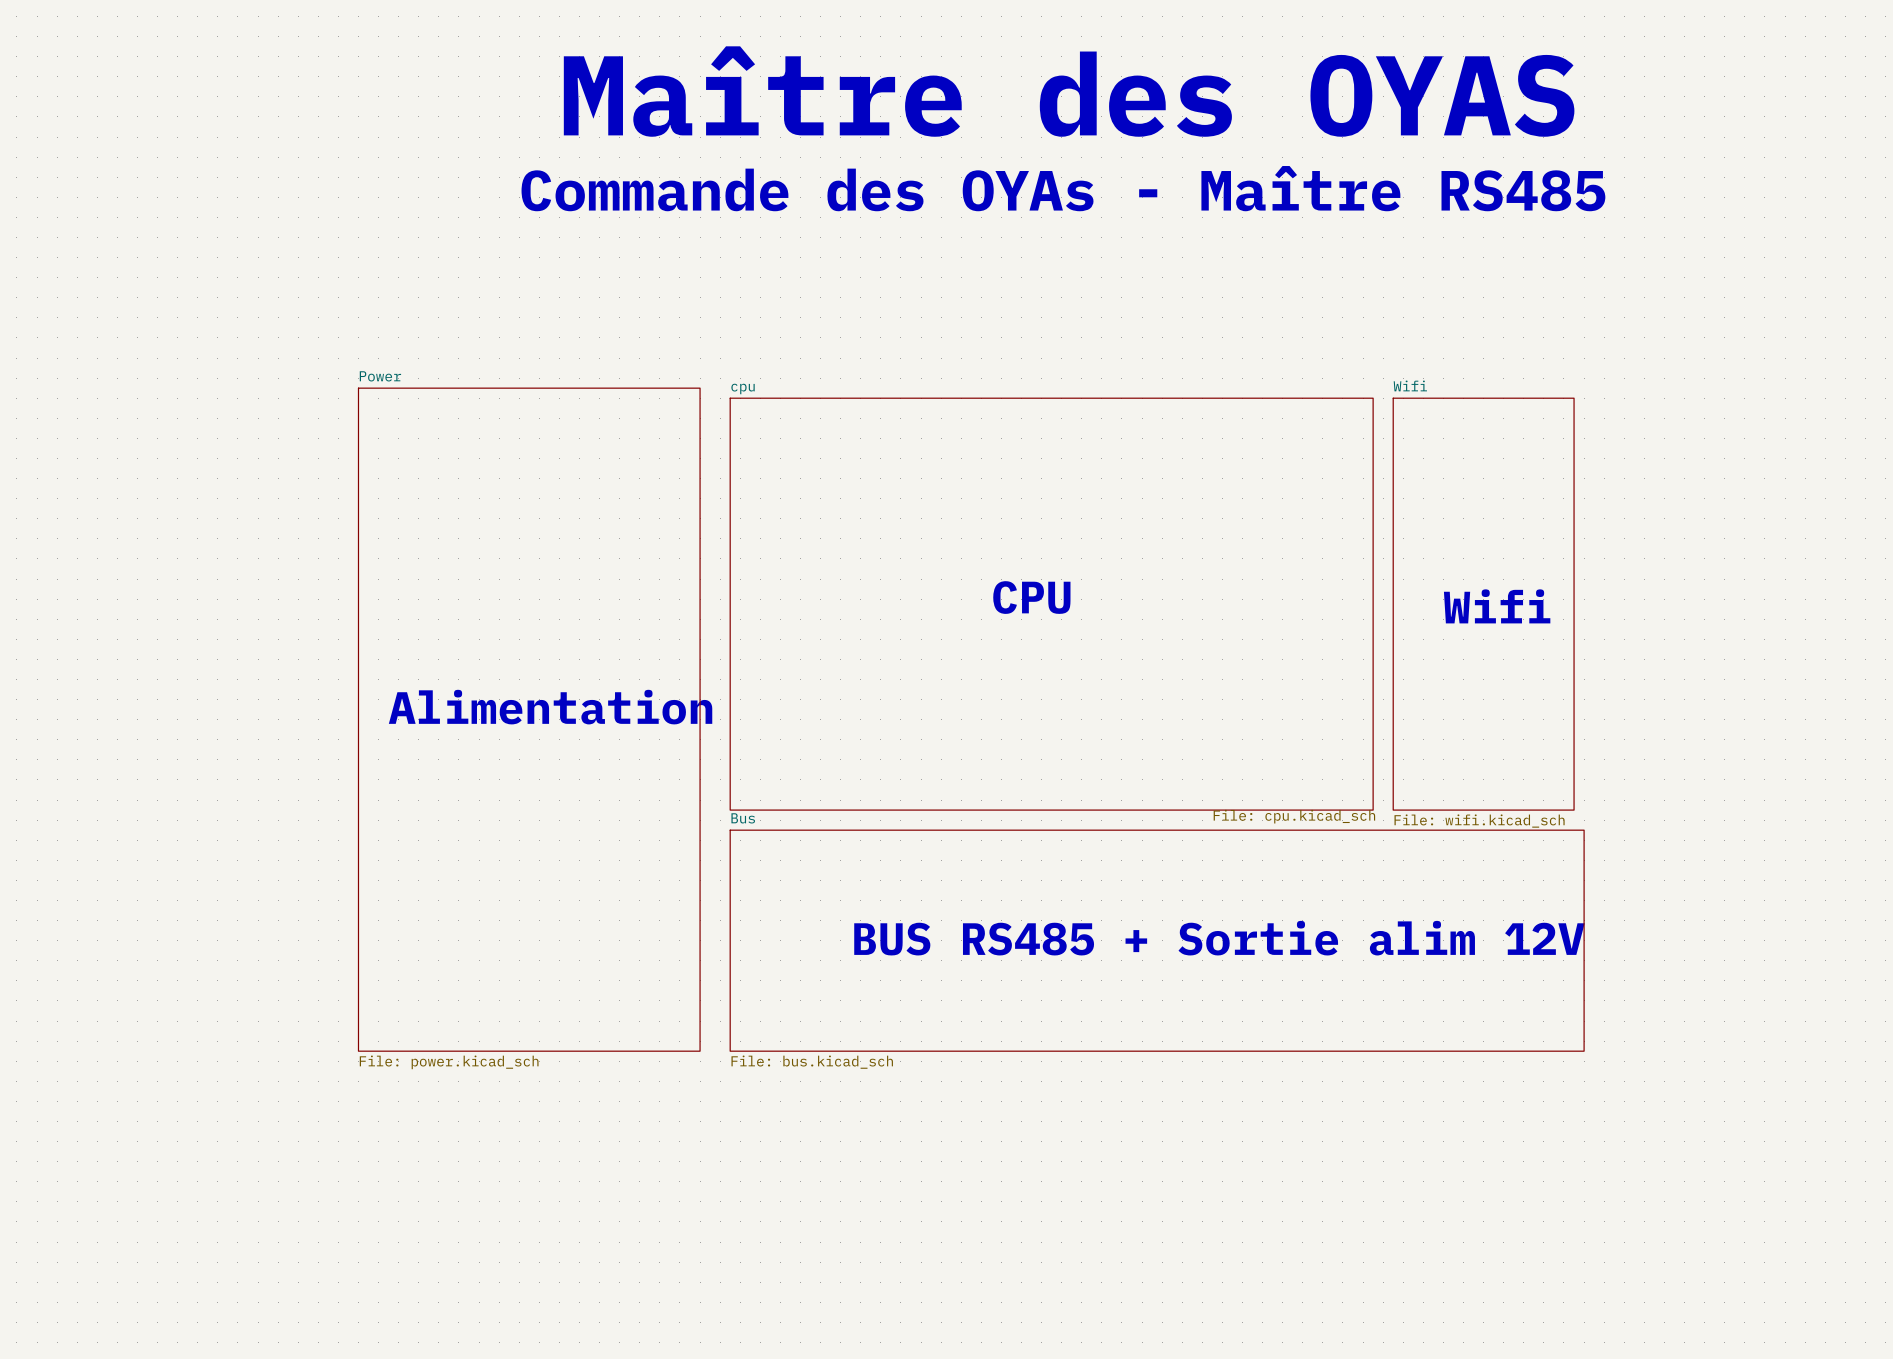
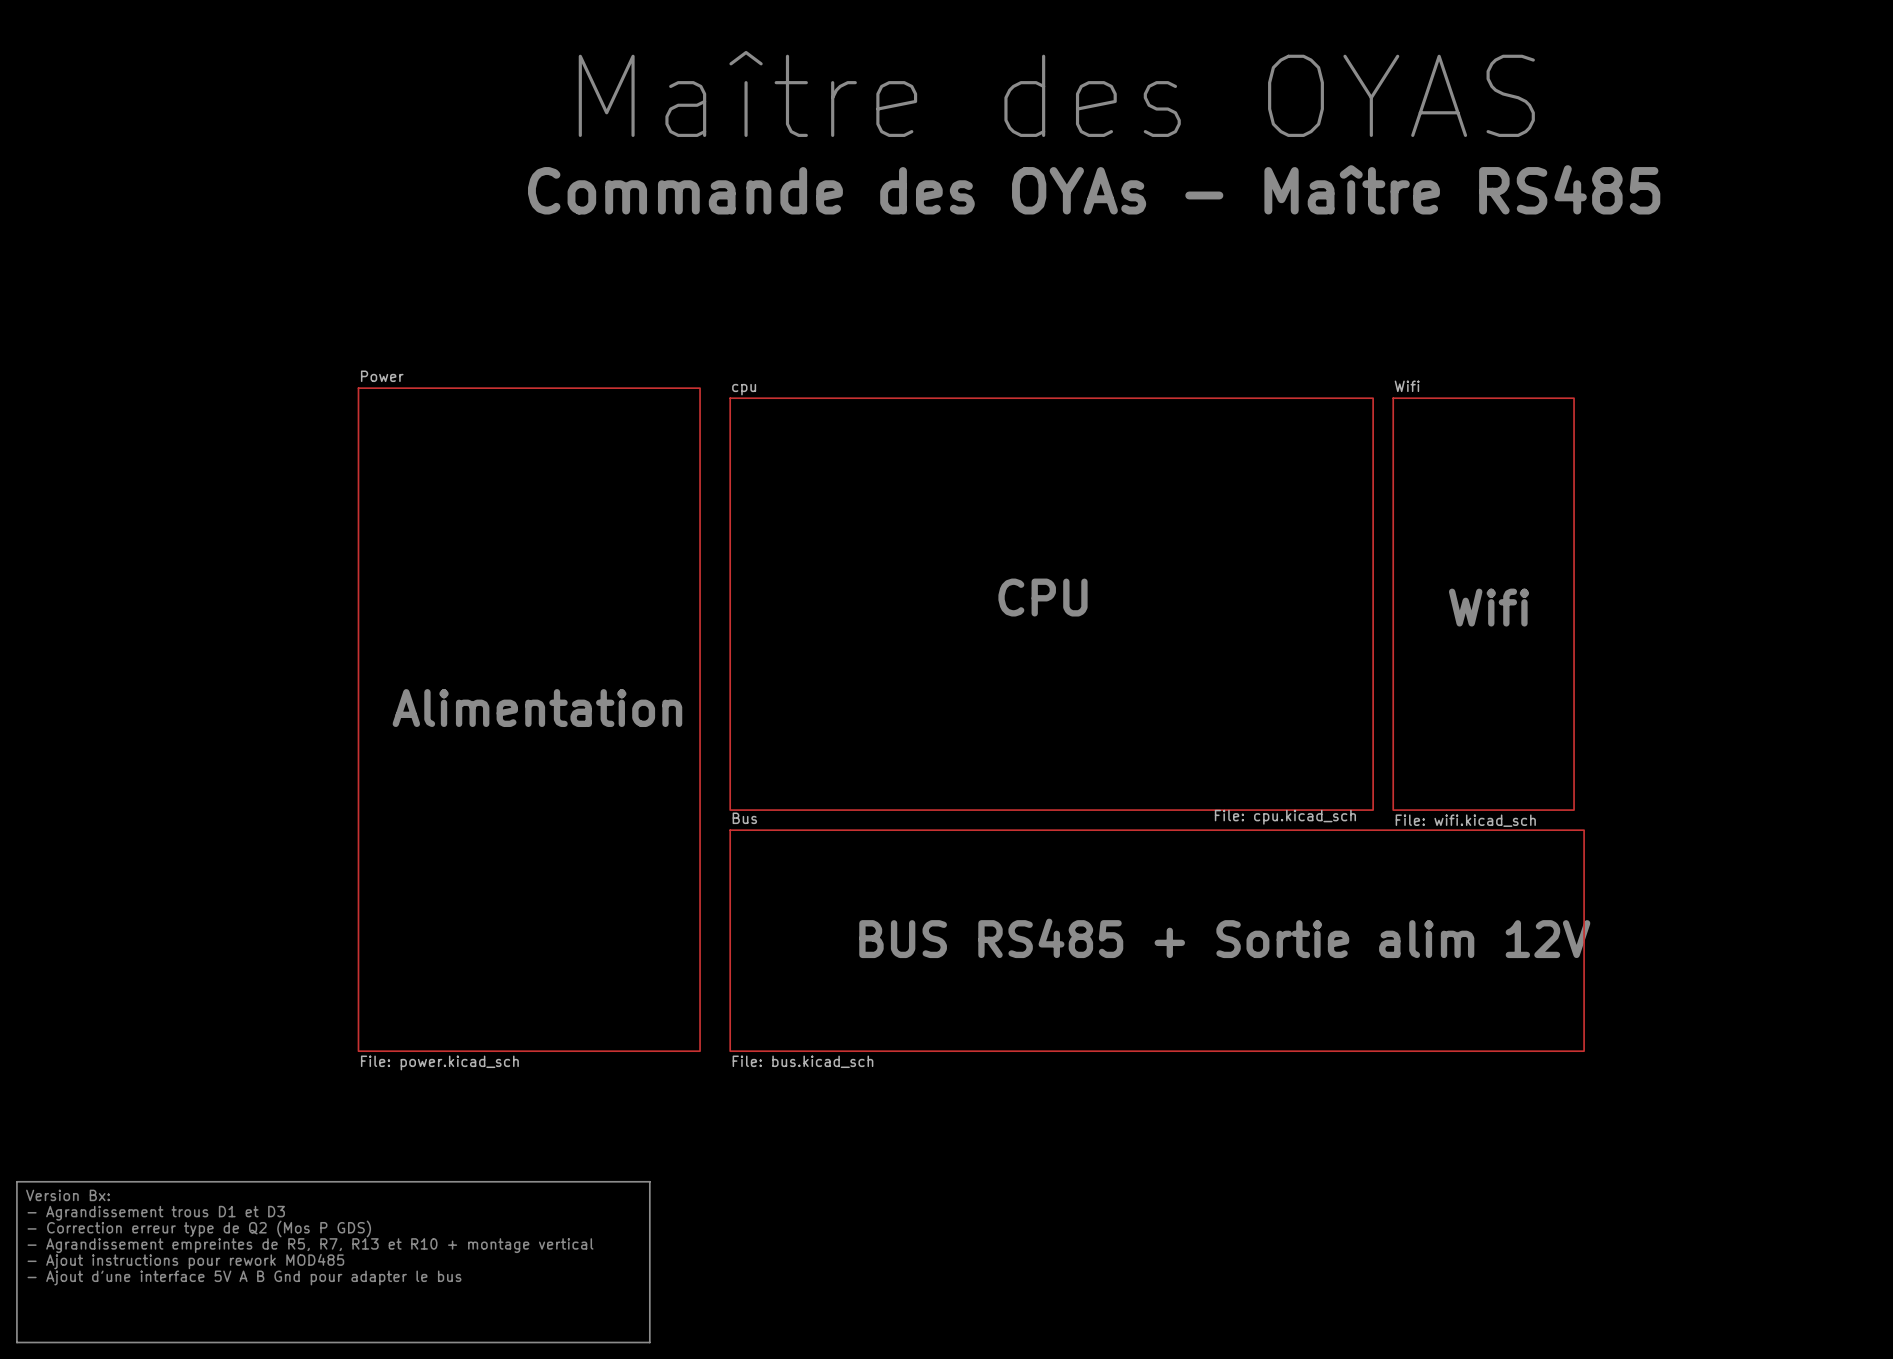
line: none -> (16, 1181) (649, 1181) (649, 1342) (16, 1342) (16, 1181)
text: none -> Version Bx: (67, 1195)
text: none -> - Agrandissement trous D1 et D3 (156, 1213)
text: none -> - Correction erreur type de Q2 (Mos P GDS) (199, 1228)
text: none -> - Agrandissement empreintes de R5, R7, R13 et R10 + montage vertical (310, 1245)
text: none -> - Ajout instructions pour rework MOD485 (185, 1261)
text: none -> - Ajout d'une interface 5V A B Gnd pour adapter le bus (244, 1277)

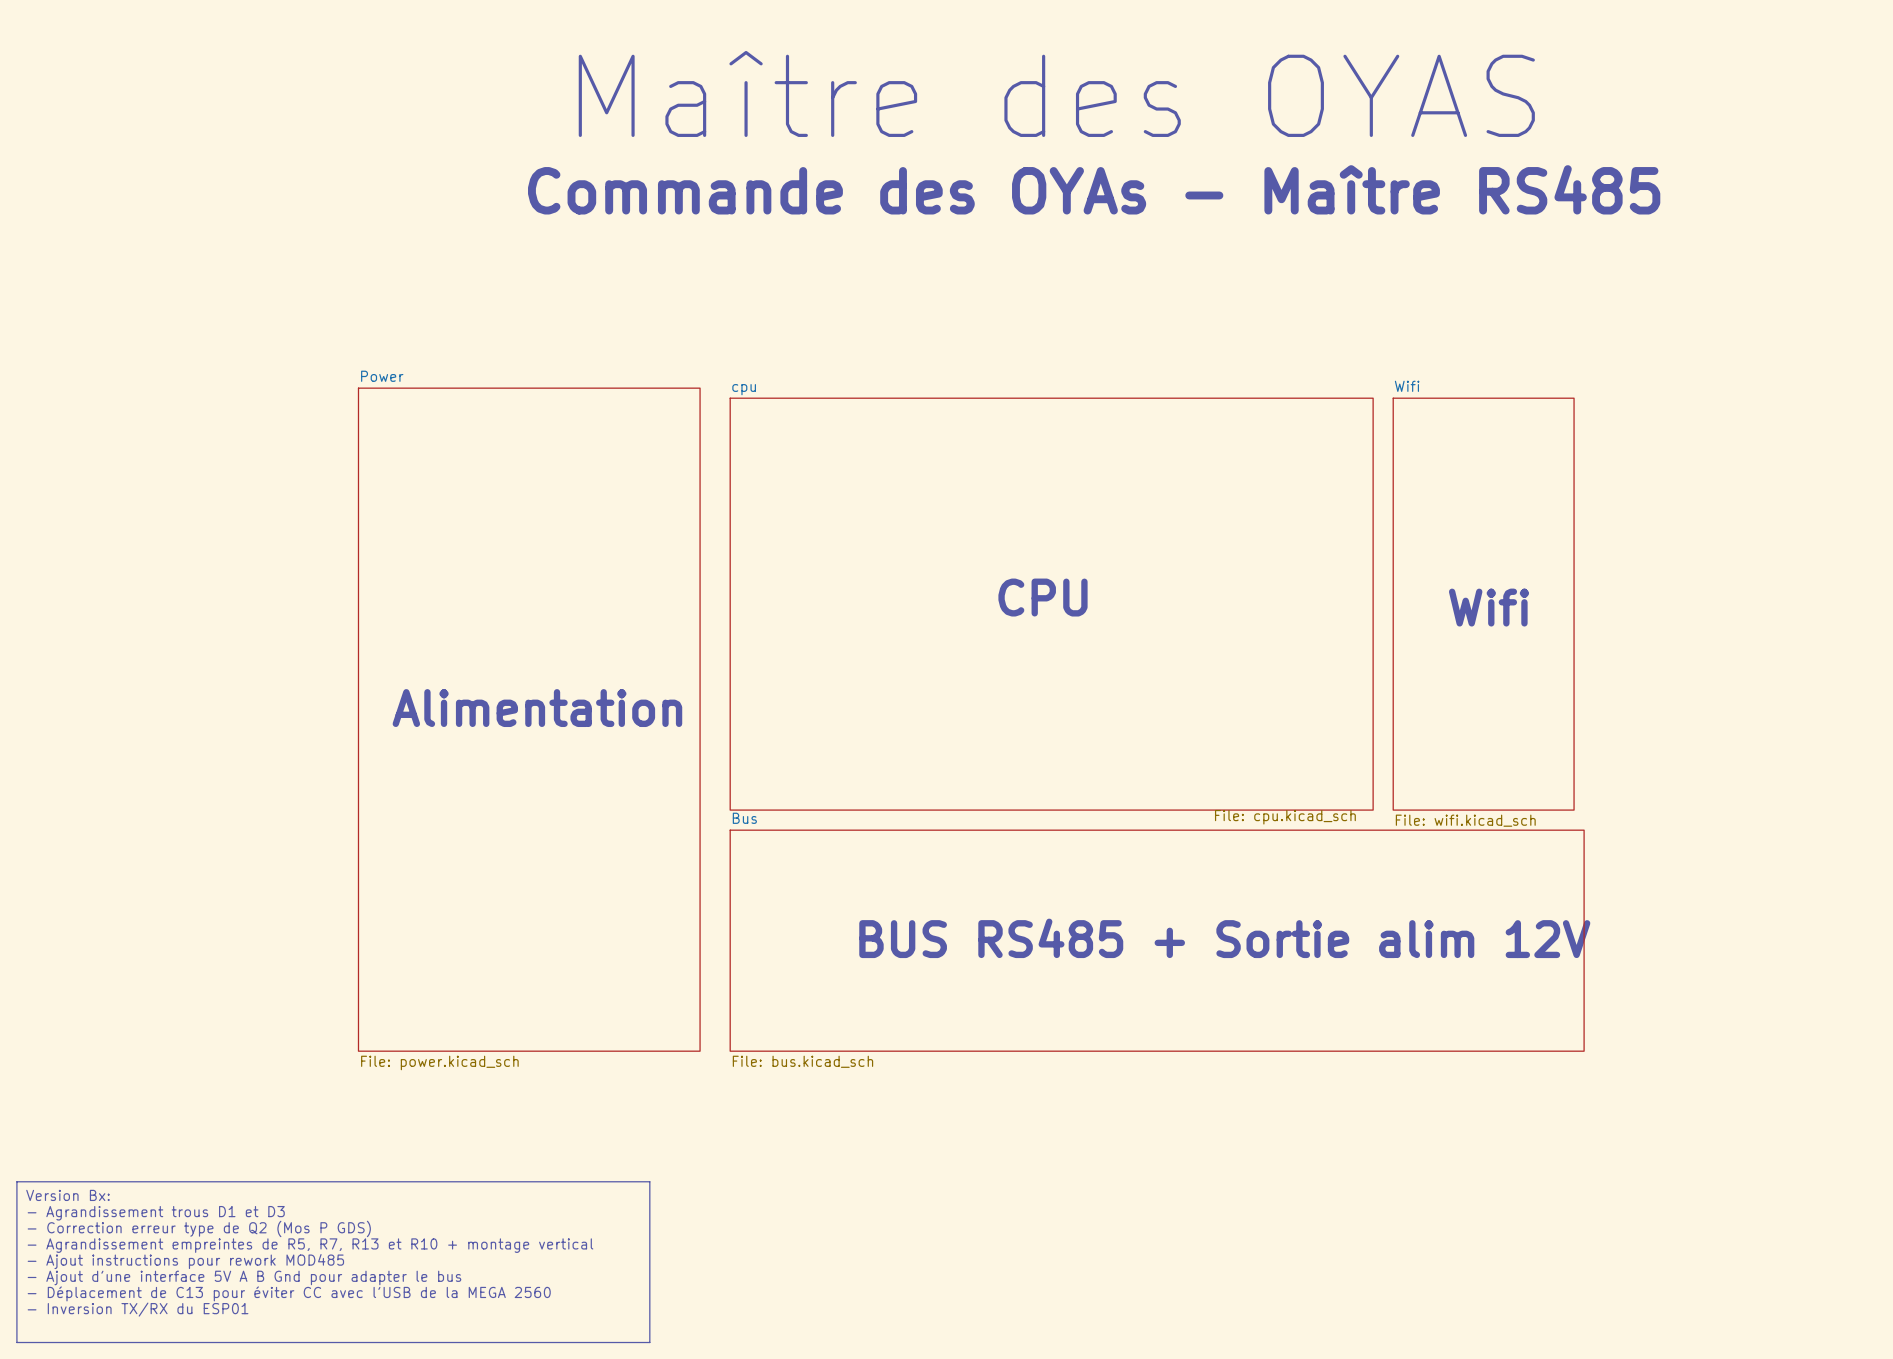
text: none -> - Déplacement de C13 pour éviter CC avec l'USB de la MEGA 2560 (289, 1293)
text: none -> - Inversion TX/RX du ESP01 (138, 1309)

